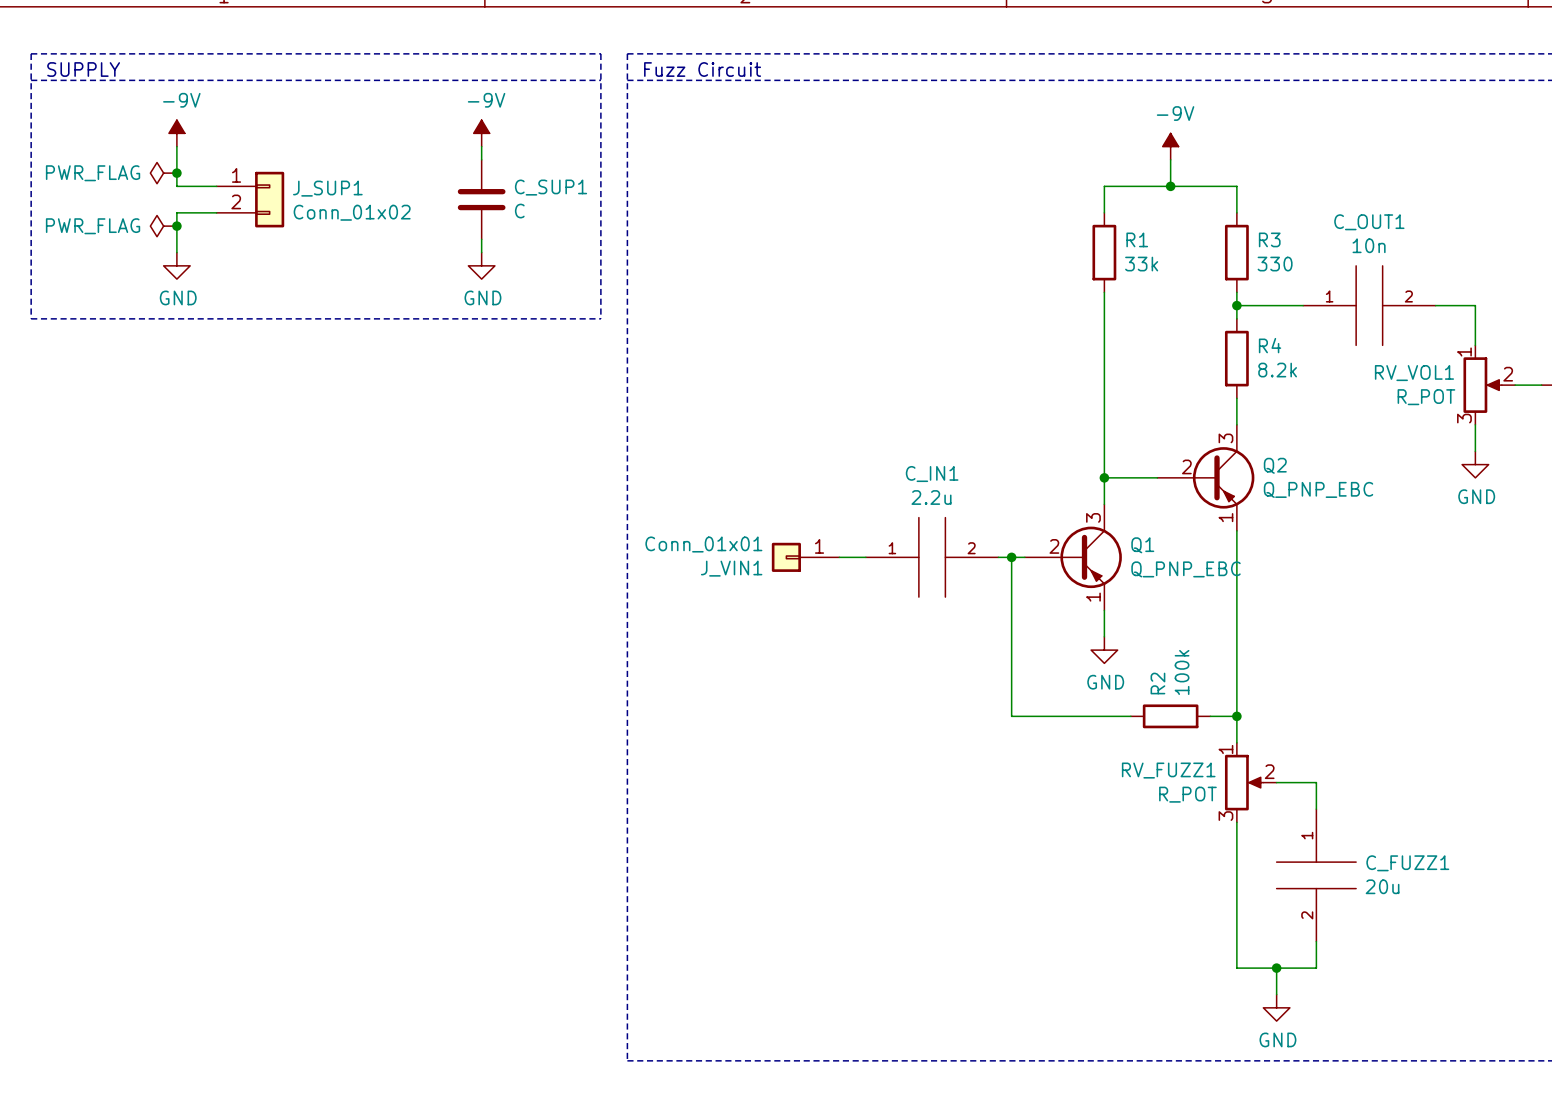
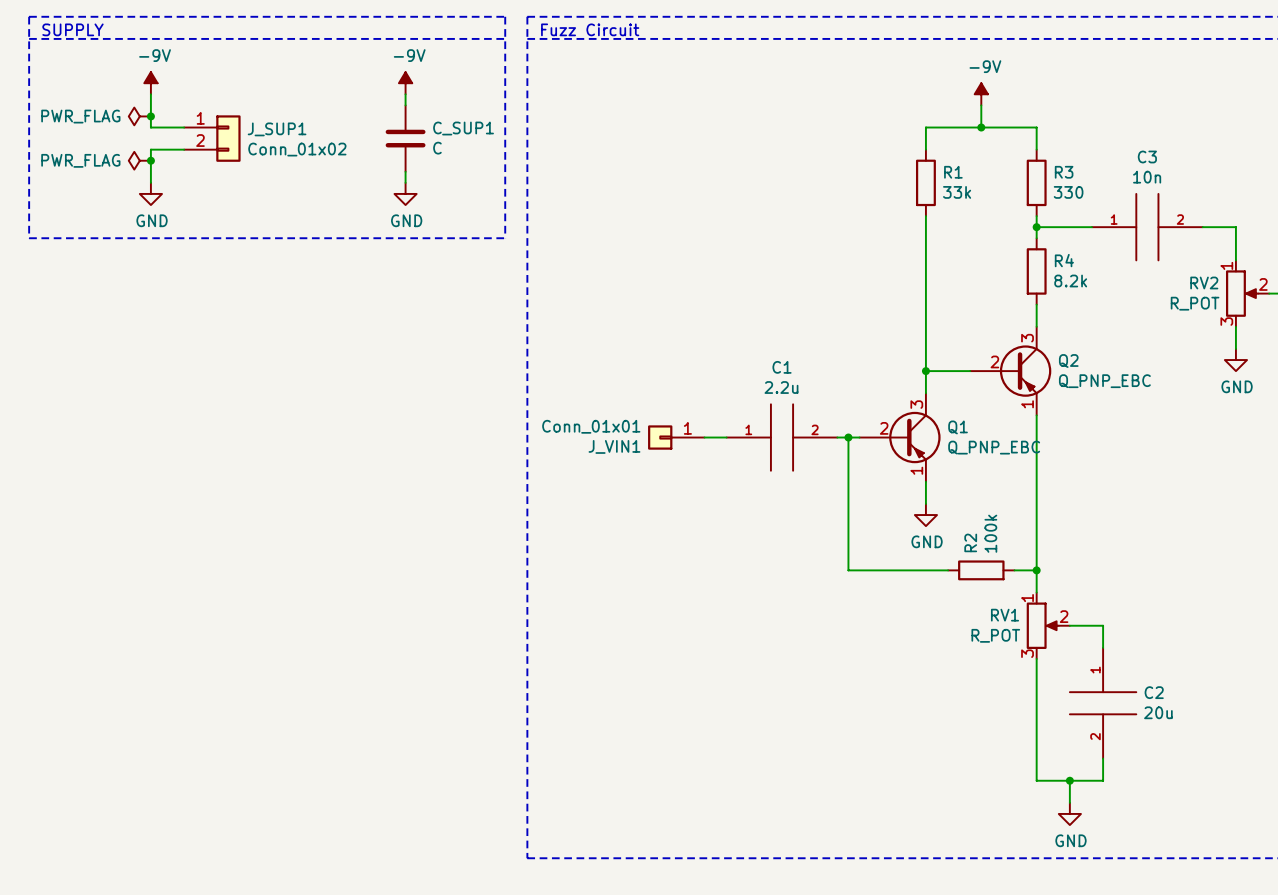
C_OUT1 name: C_OUT1 (1369, 222) -> C3 (1147, 156)
RV_VOL1 name: RV_VOL1 (1414, 373) -> RV2 (1204, 282)
C_IN1 name: C_IN1 (932, 474) -> C1 (782, 367)
RV_FUZZ1 name: RV_FUZZ1 (1168, 770) -> RV1 (1005, 615)
C_FUZZ1 name: C_FUZZ1 (1407, 863) -> C2 (1154, 692)

